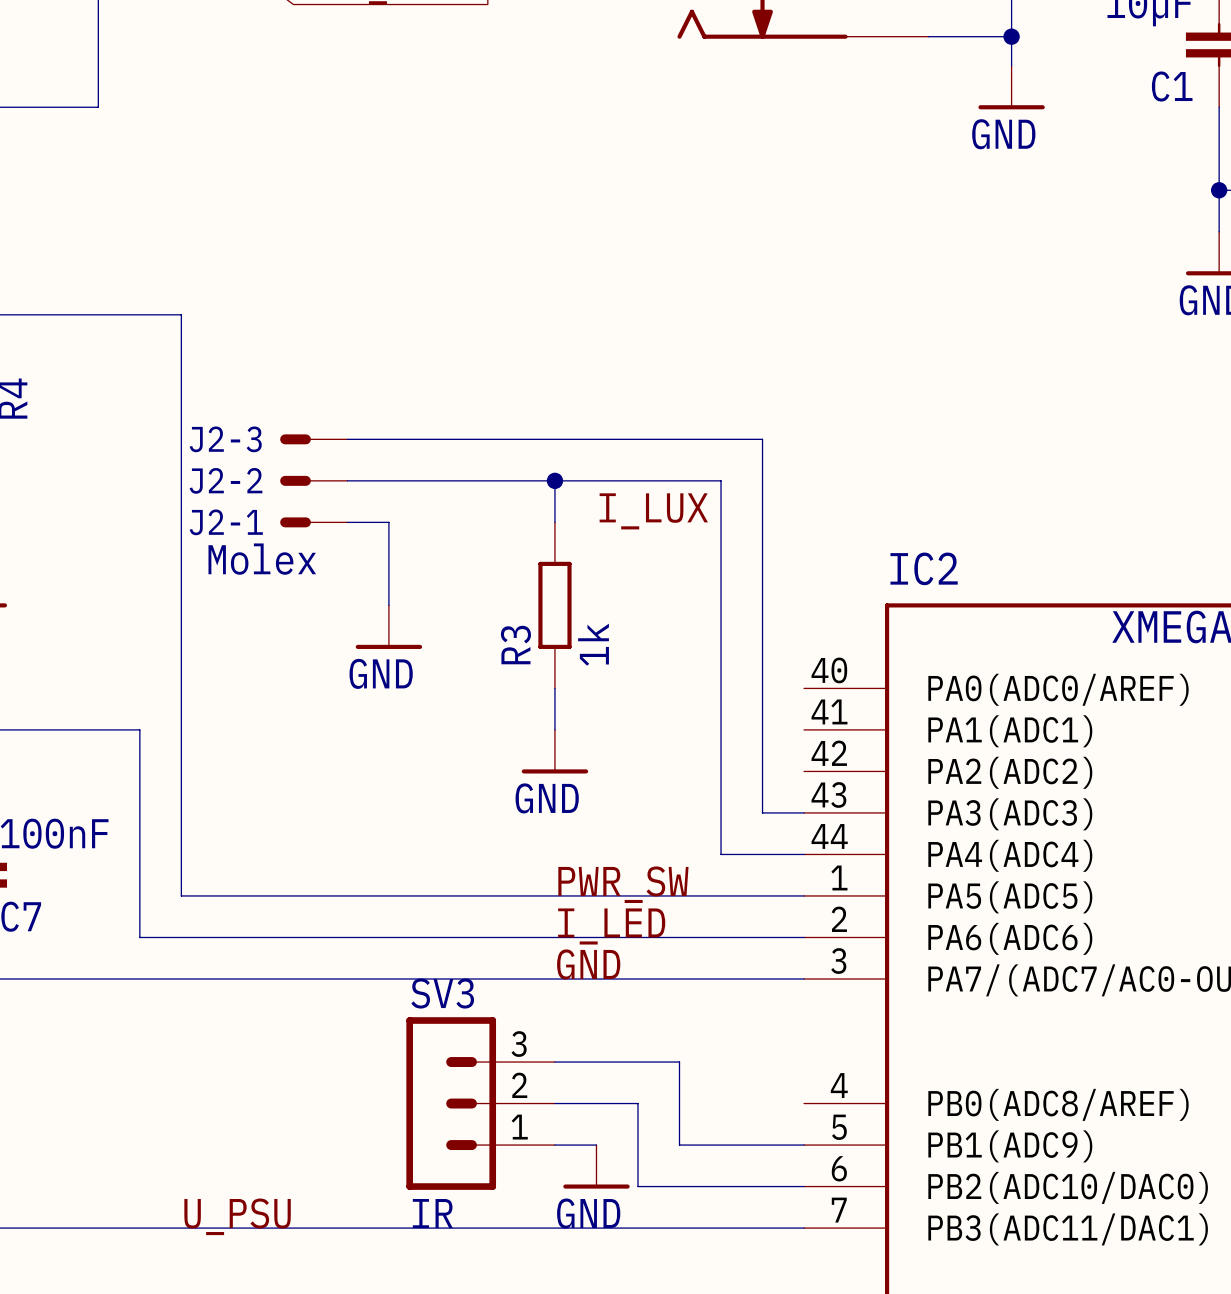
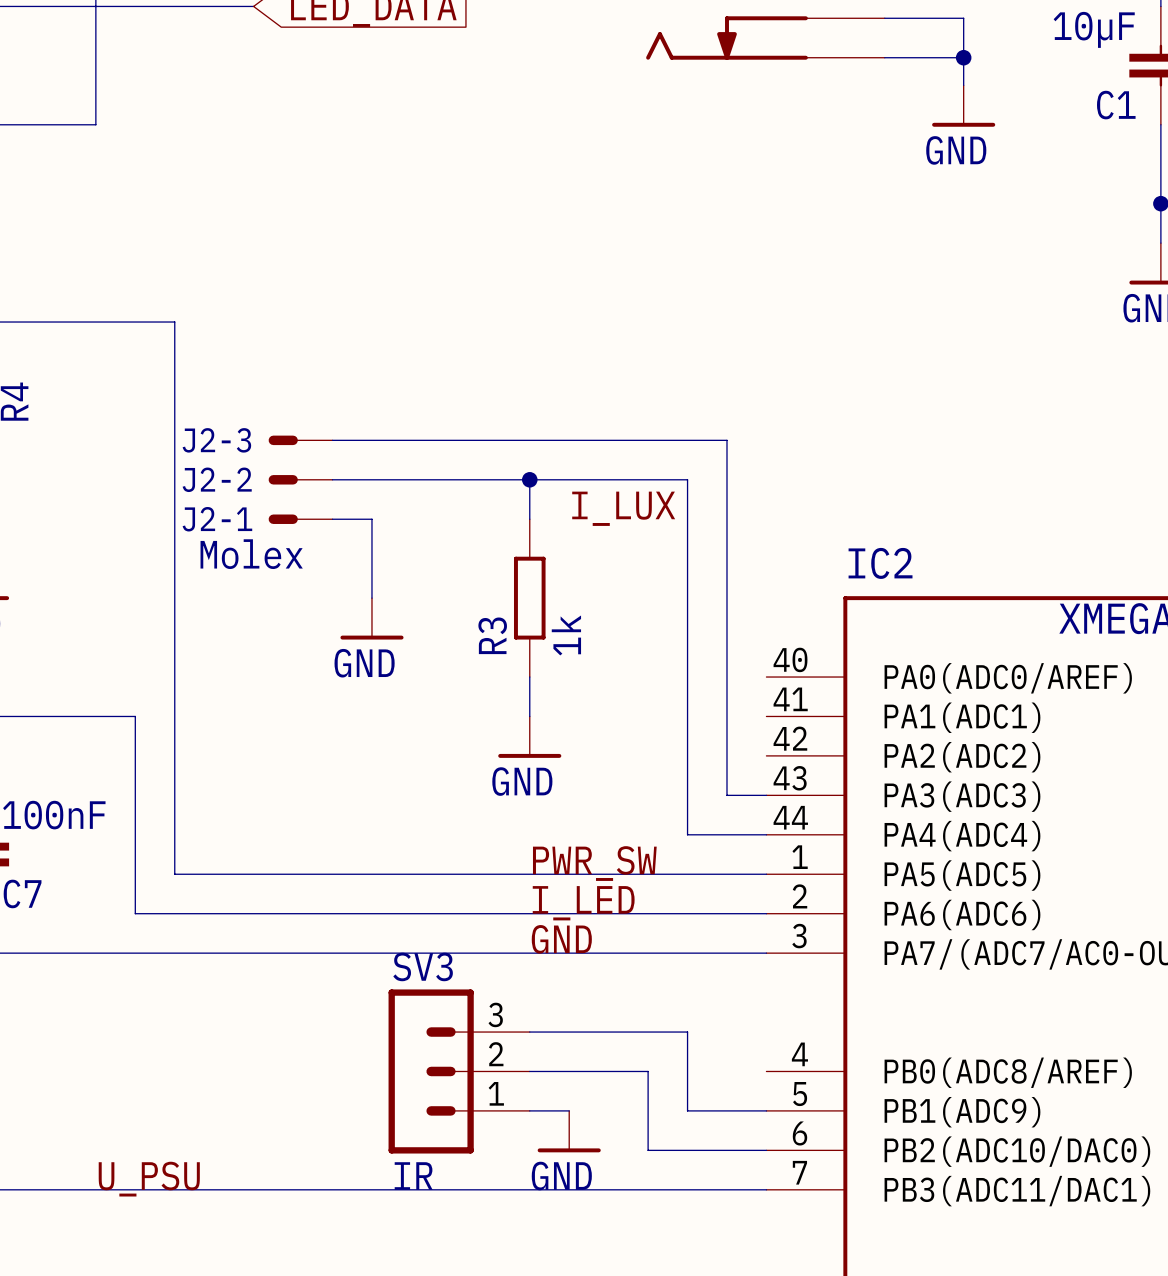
wire: (679, 1062) (679, 1103) -> (608, 1071) (648, 1071)
wire: (637, 1103) (637, 1186) (679, 1186) -> (648, 1110) (648, 1150)
wire: (679, 1145) (721, 1145) -> (648, 1032) (687, 1032) (687, 1110)
label position: U_PSU (237, 1216) -> U_PSU (149, 1179)

